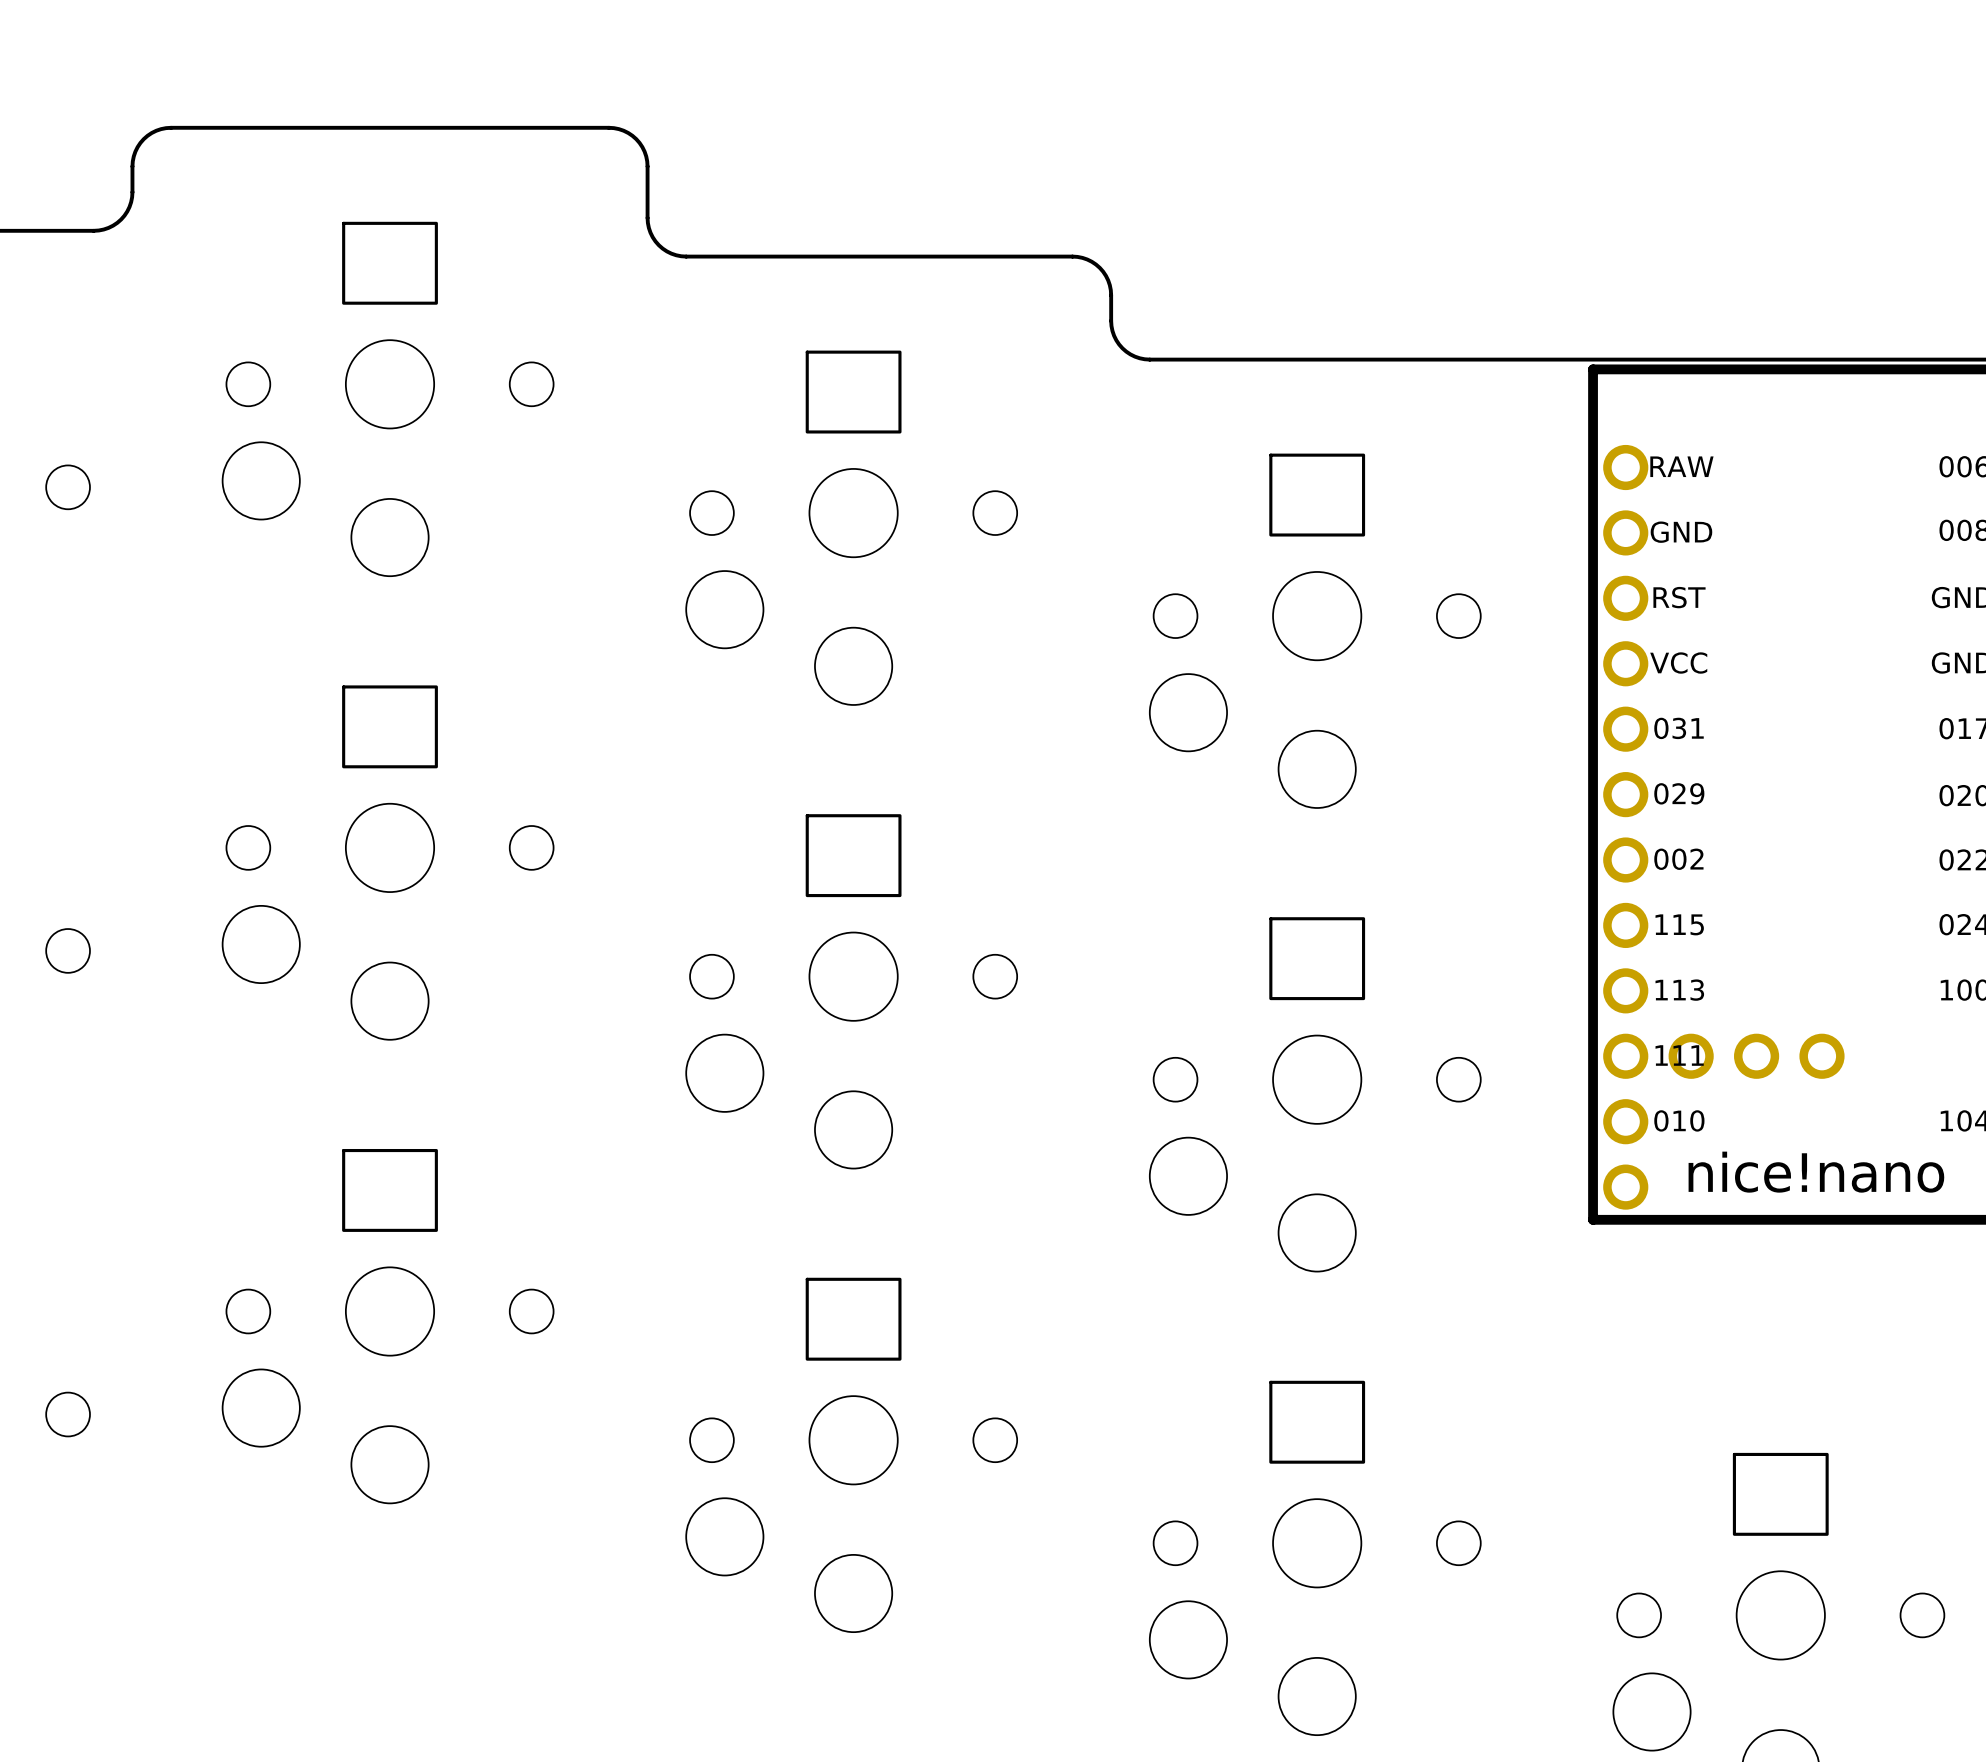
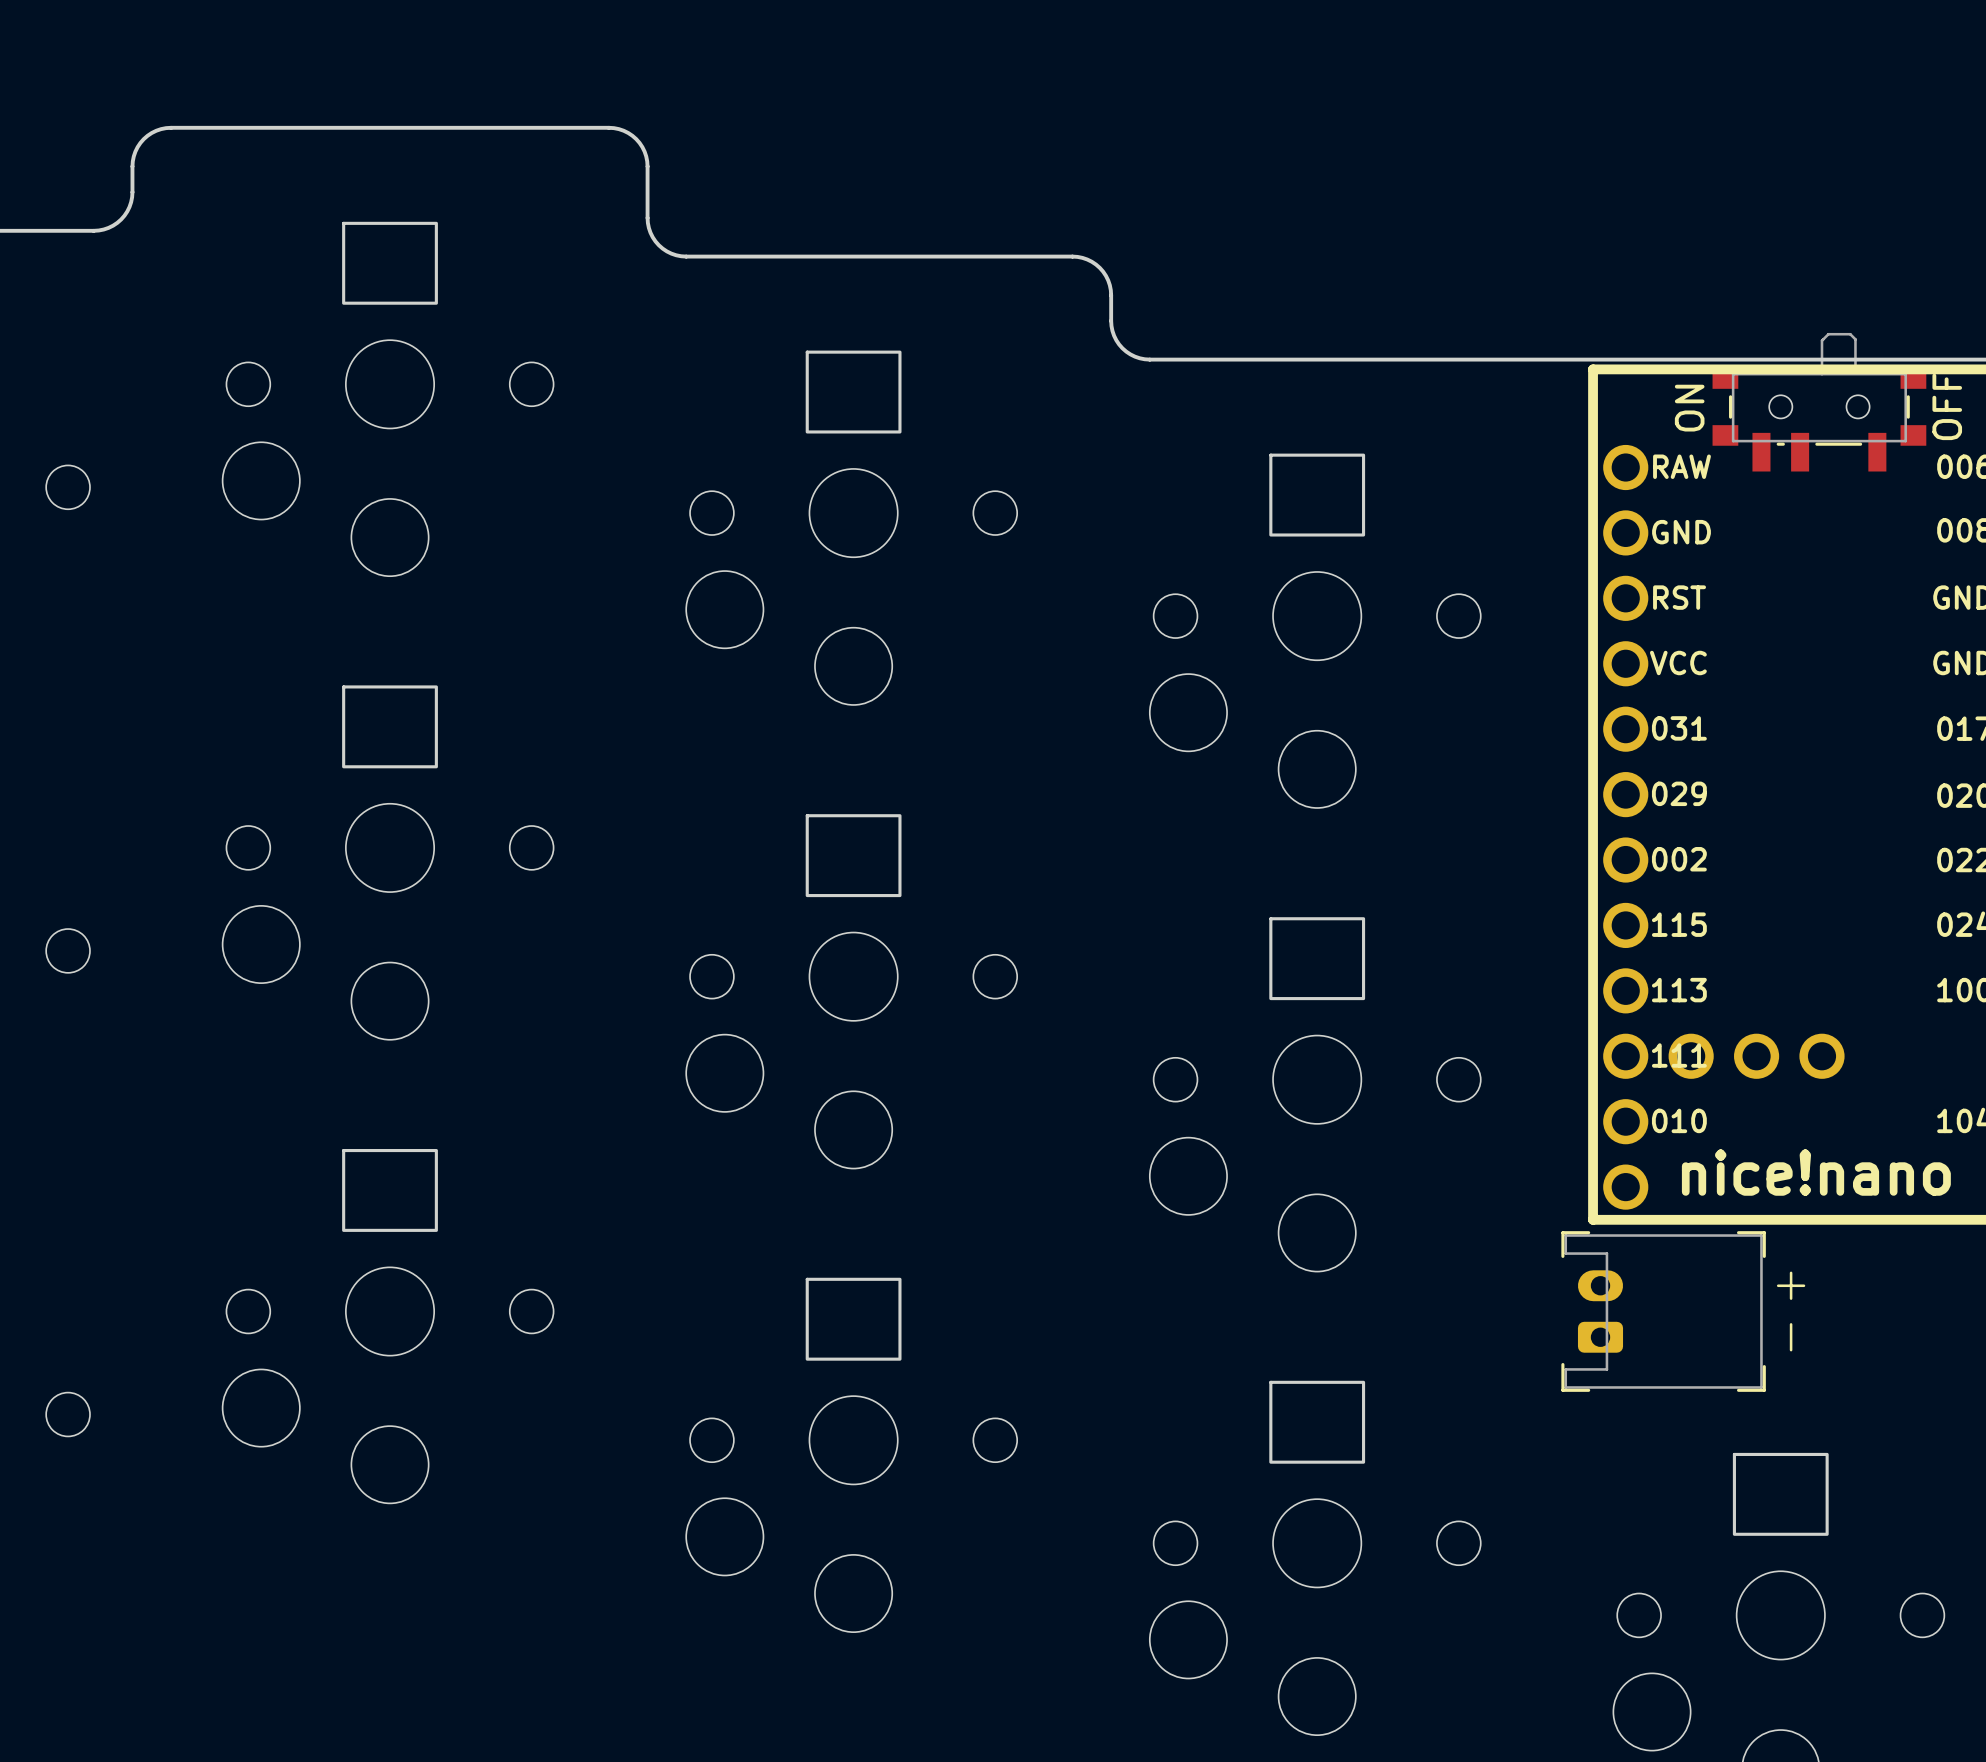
part: none -> (1819, 402)
part: none -> (1683, 1311)

